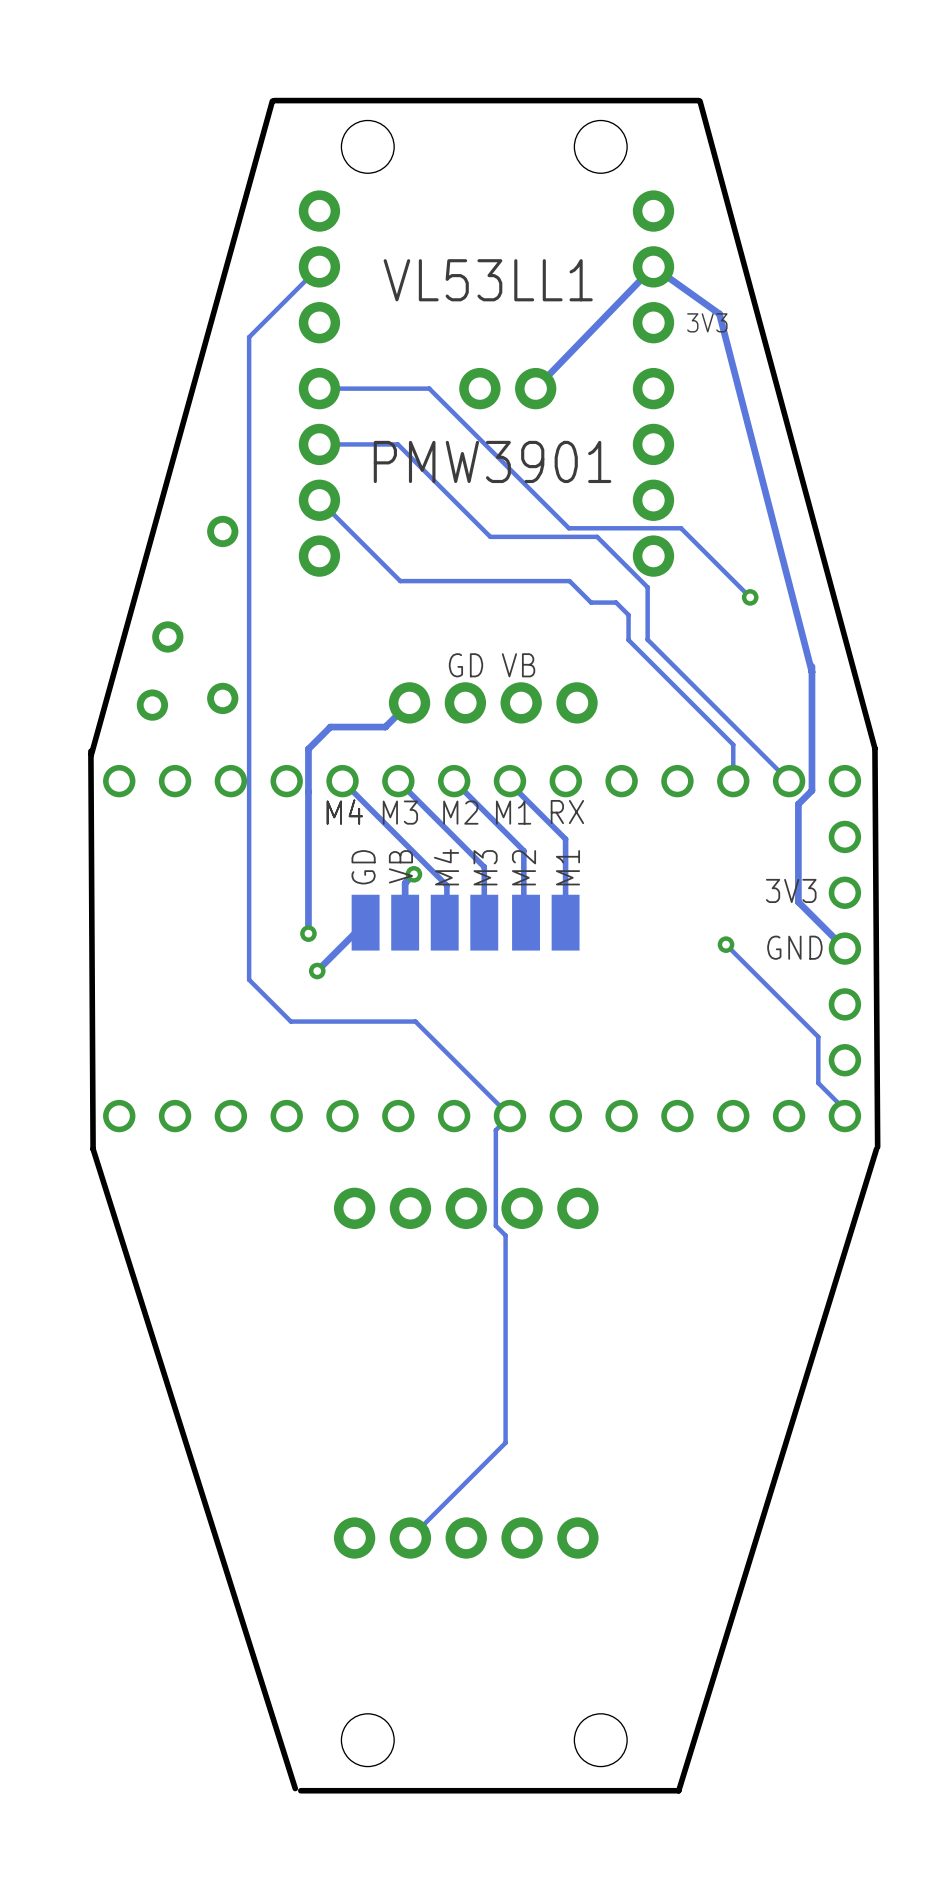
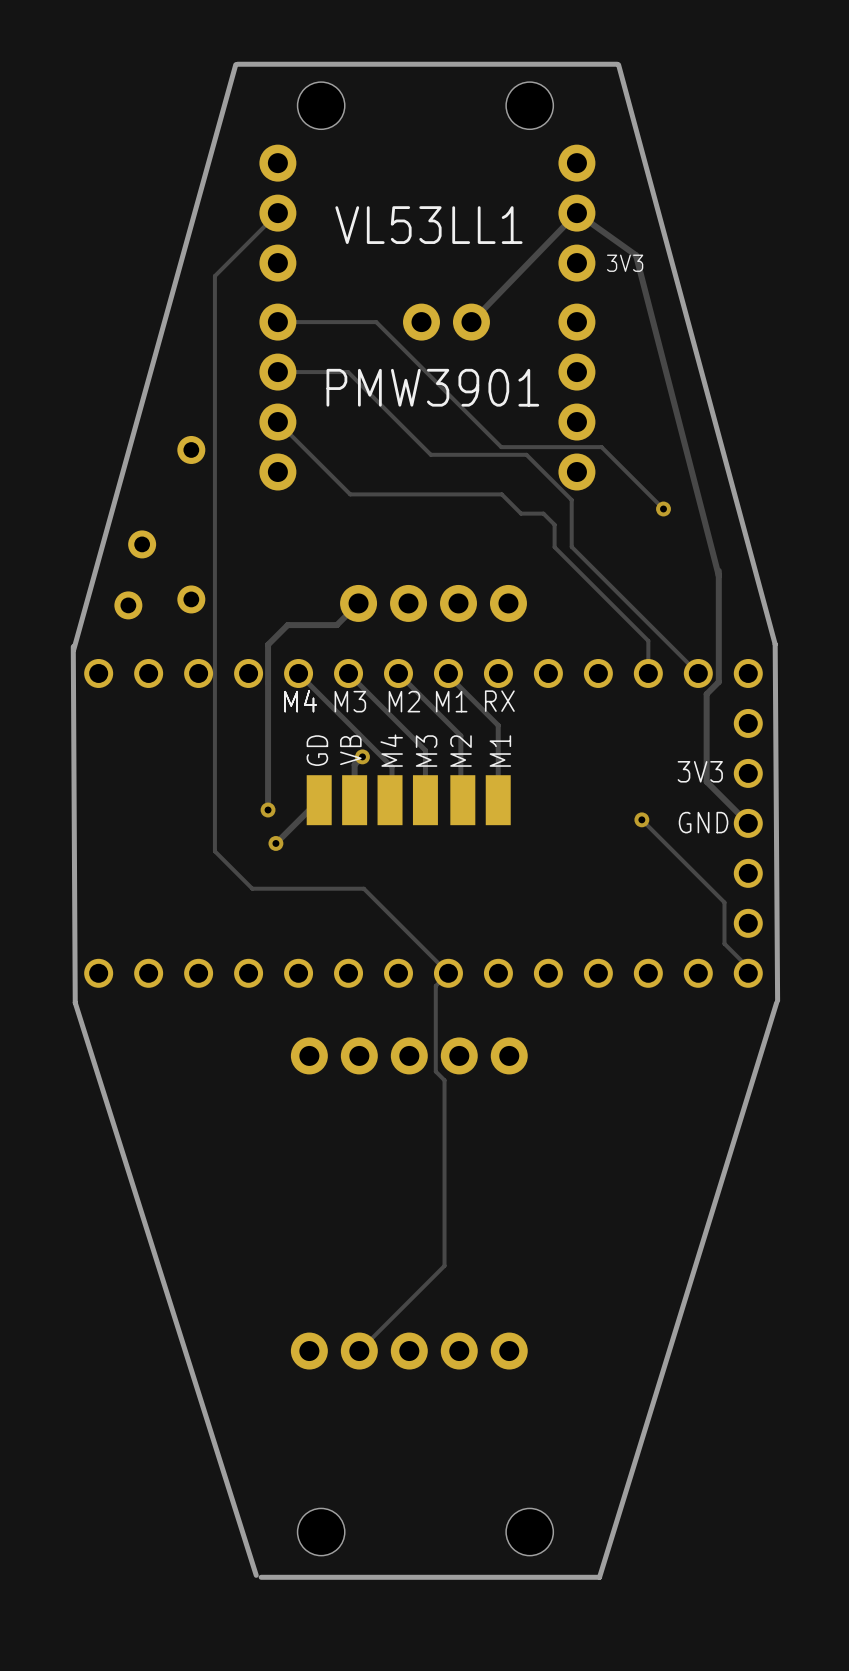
text: GD (465, 665) -> none
text: VB (518, 665) -> none

